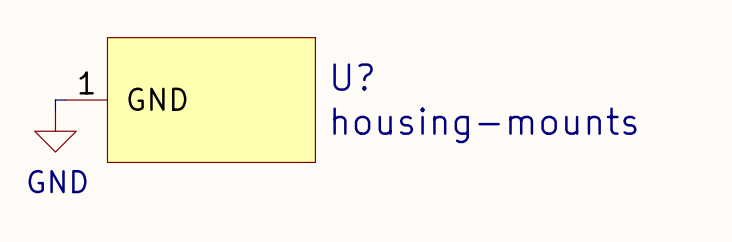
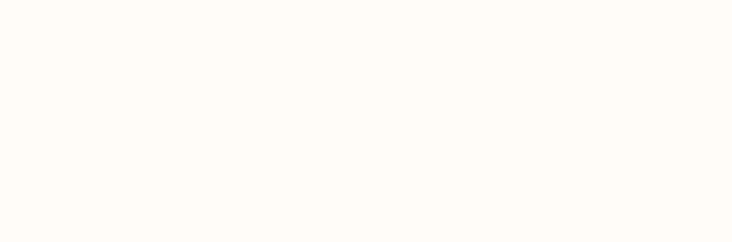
wire: (65, 100) (55, 100) (55, 110) -> none
U?: housing-mounts (190, 100) -> none
power symbol: GND (55, 131) -> none

